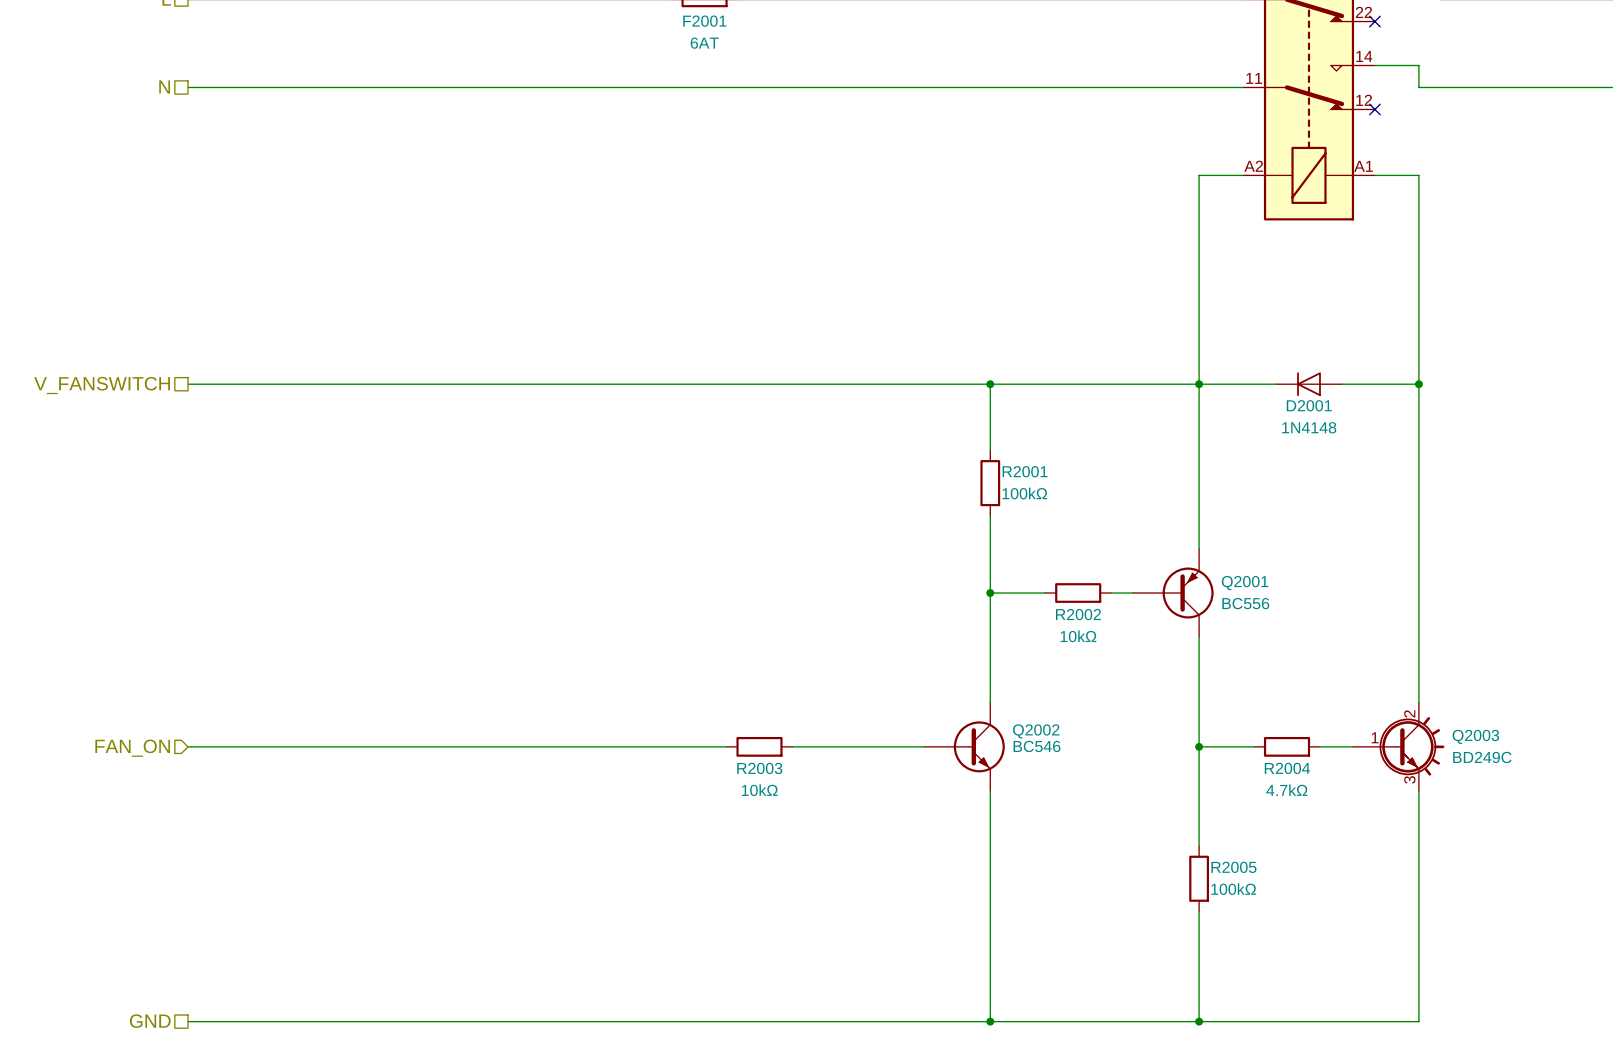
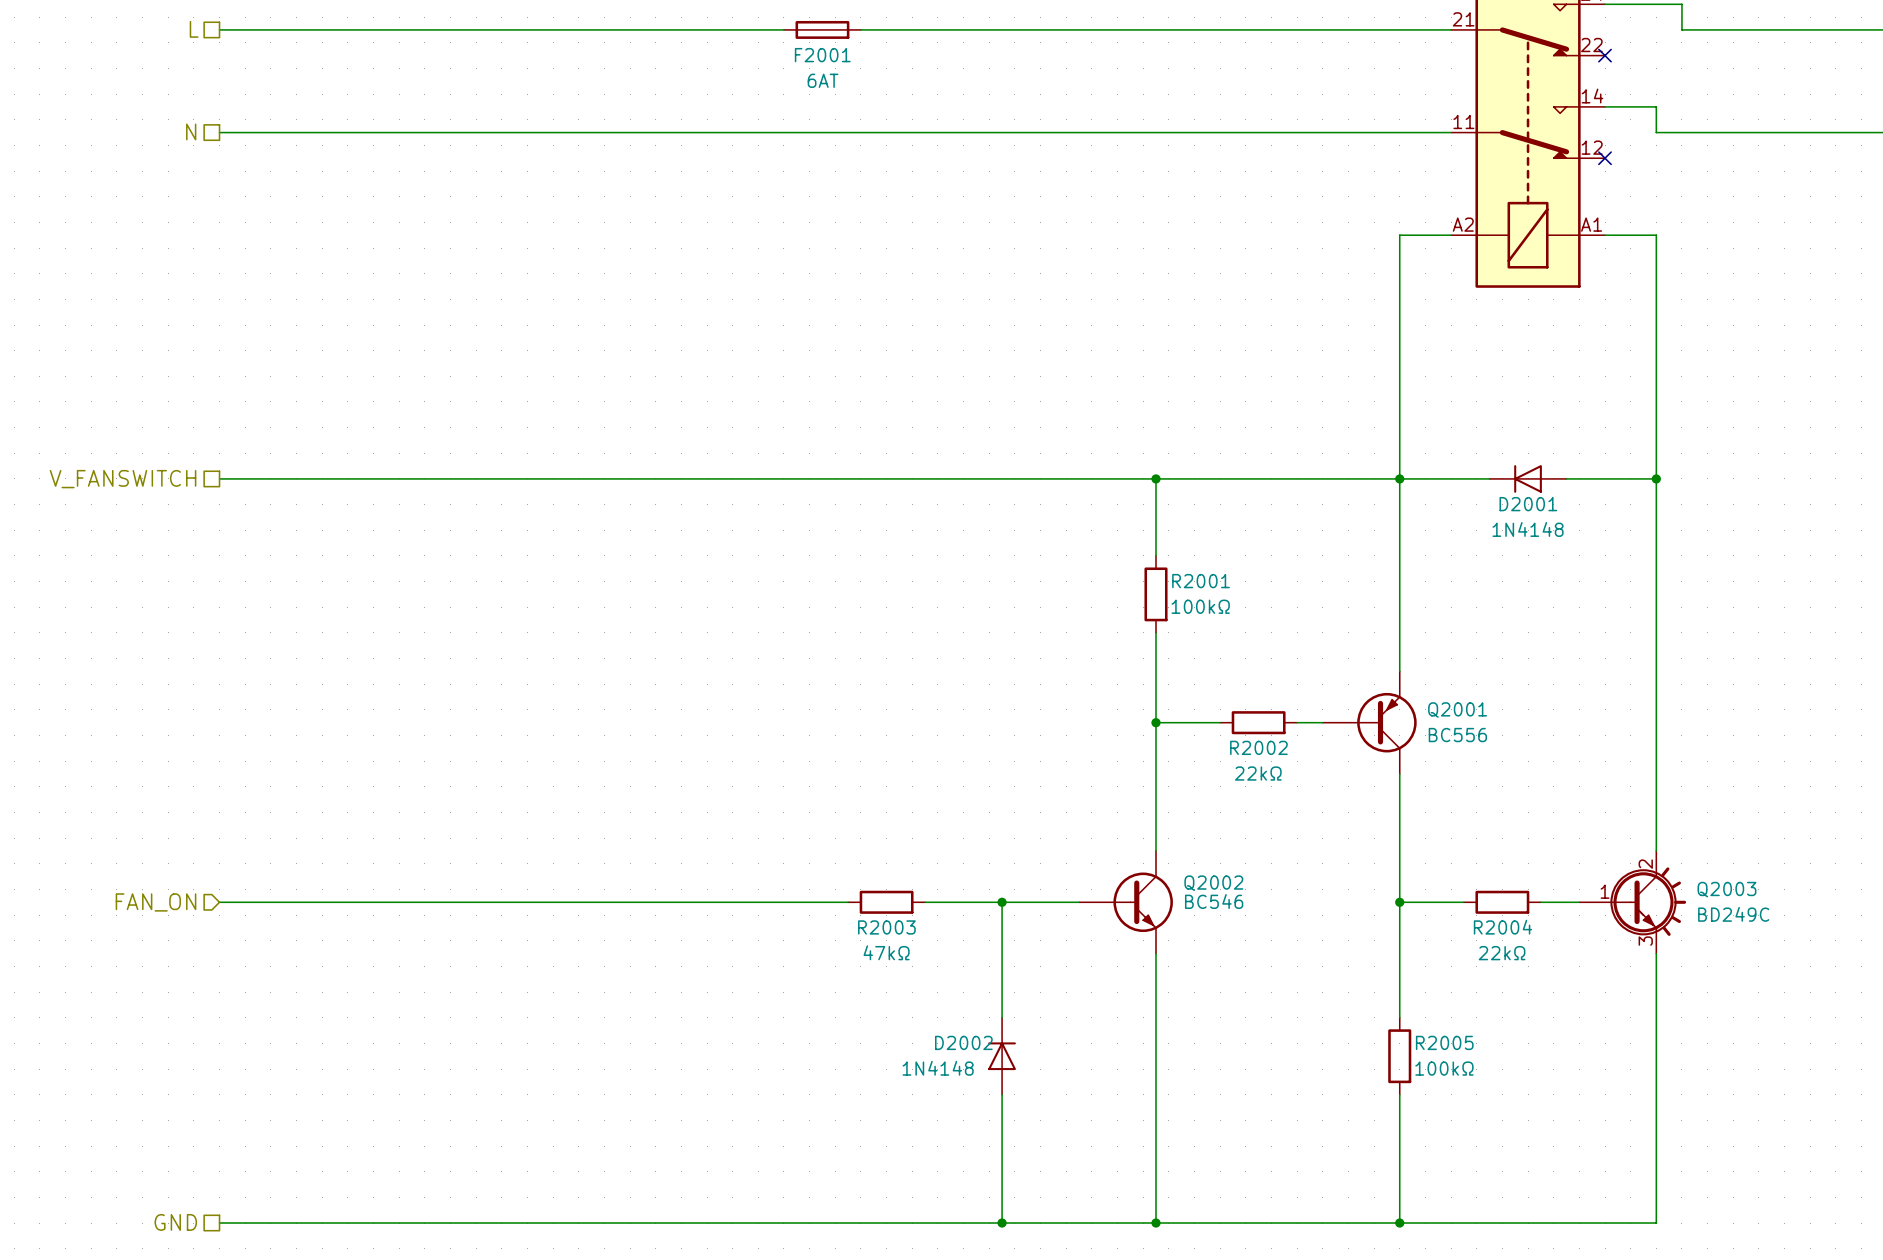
R2002 value: 10kΩ (1078, 636) -> 22kΩ (1258, 773)
wire: none -> (1002, 902) (1002, 1017)
junction: none -> (1002, 902)
R2003 value: 10kΩ (759, 790) -> 47kΩ (886, 952)
R2004 value: 4.7kΩ (1286, 790) -> 22kΩ (1502, 953)
D2002: none -> 1N4148 (1002, 1056)
wire: none -> (1002, 1094) (1002, 1223)
junction: none -> (1002, 1223)

